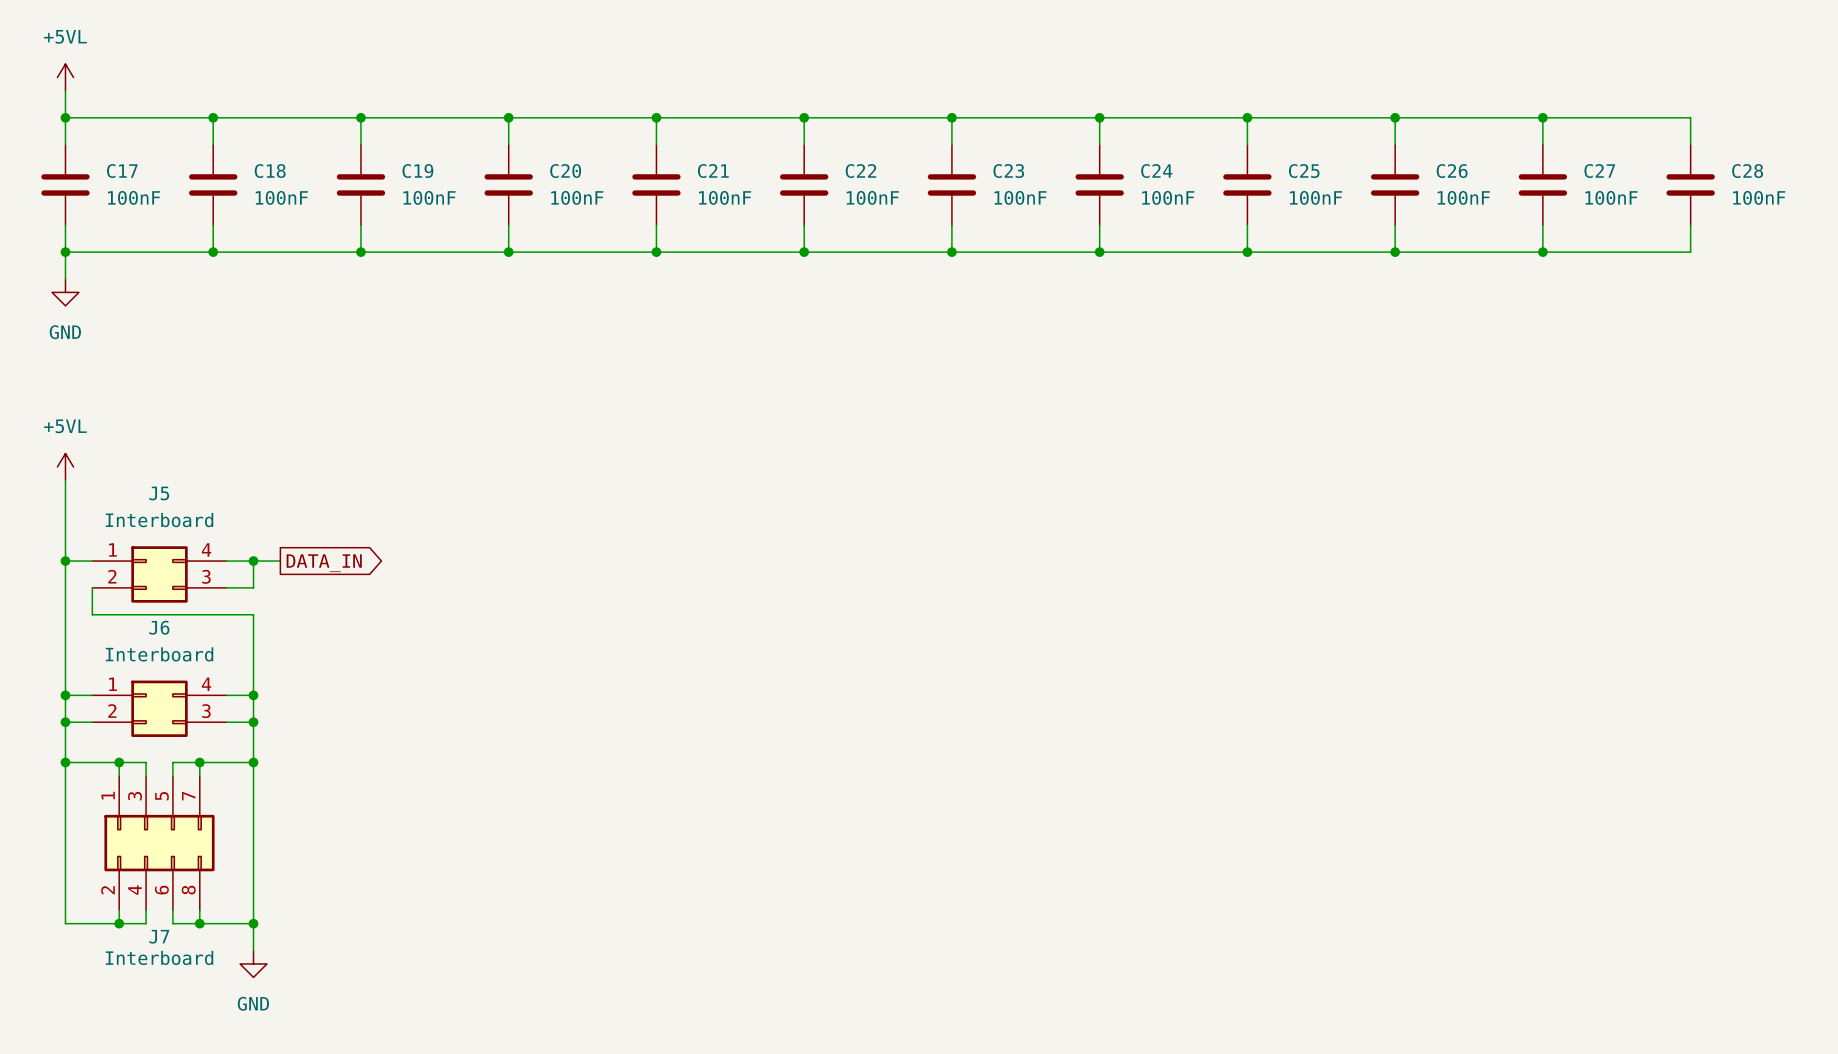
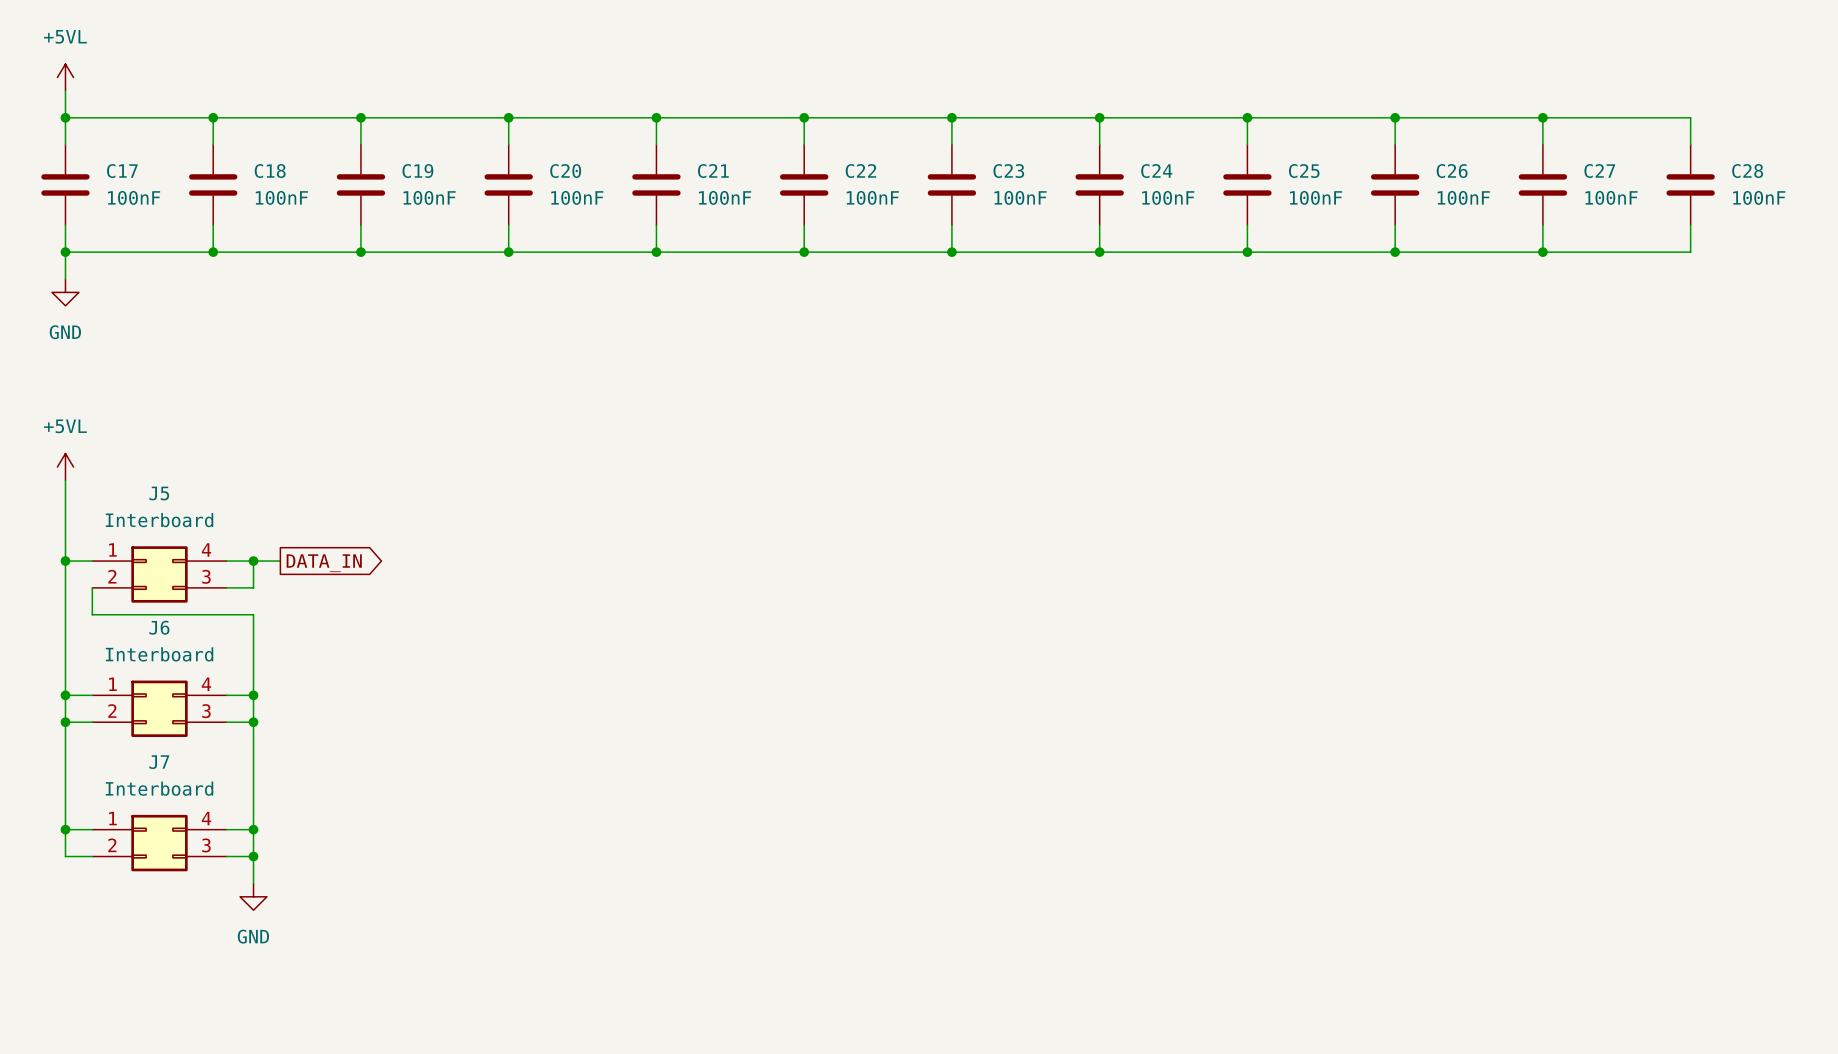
wire: (65, 762) (146, 762) (146, 775) -> none
junction: (65, 762) -> none
wire: (119, 762) (119, 775) -> none
junction: (119, 762) -> none
wire: (199, 762) (199, 775) -> none
junction: (199, 762) -> none
wire: (253, 762) (172, 762) (172, 775) -> none
junction: (253, 762) -> none
J7 symbol: [104, 775, 215, 911] -> [92, 814, 227, 872]
wire: none -> (65, 829) (92, 829)
junction: none -> (65, 829)
wire: none -> (226, 829) (253, 829)
junction: none -> (253, 829)
wire: (65, 856) (65, 923) (146, 923) (146, 910) -> (65, 856) (92, 856)
wire: none -> (226, 856) (253, 856)
junction: none -> (253, 856)
wire: (253, 883) (253, 950) -> none
wire: (119, 910) (119, 923) -> none
wire: (172, 910) (172, 923) (253, 923) -> none
wire: (199, 910) (199, 923) -> none
junction: (119, 923) -> none
junction: (199, 923) -> none
junction: (253, 923) -> none
J7 name position: J7 (159, 936) -> J7 (159, 762)
J7 value position: Interboard (159, 957) -> Interboard (159, 788)
power symbol position: GND (253, 963) -> GND (253, 896)

